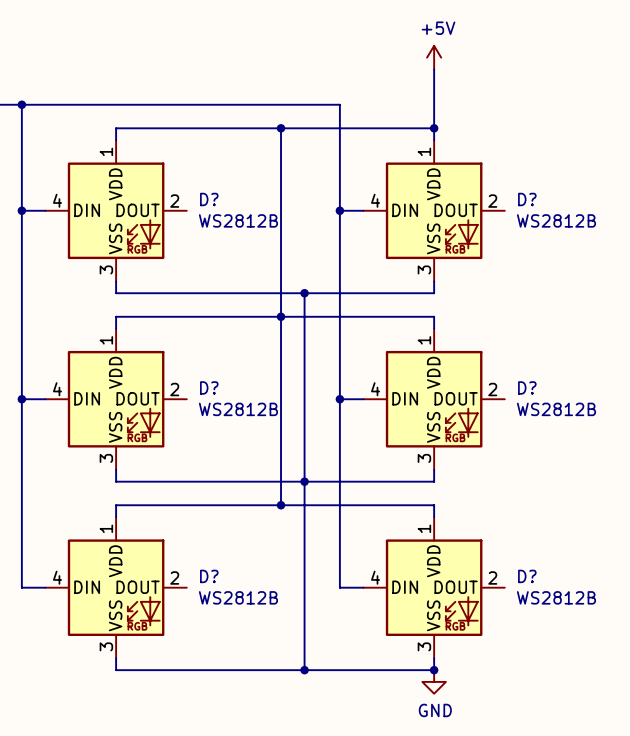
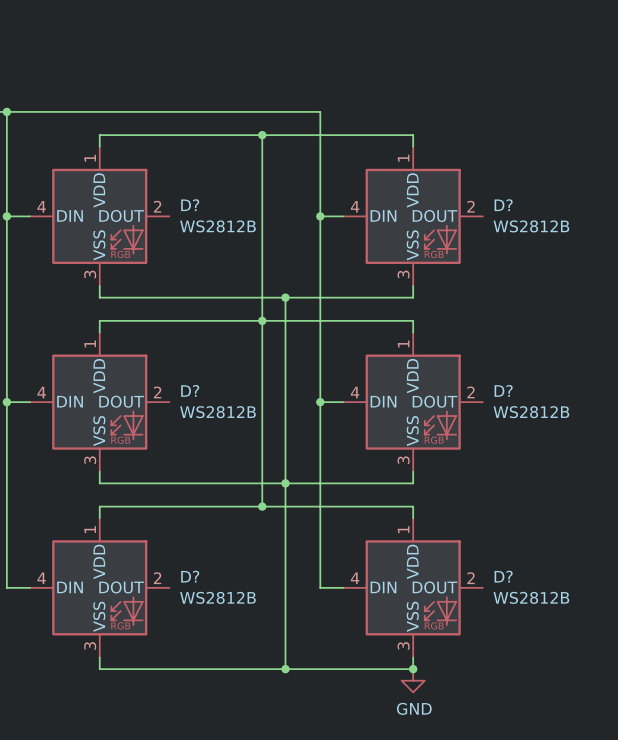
power symbol: +5V (434, 57) -> none
wire: (434, 69) (434, 128) -> none
junction: (434, 128) -> none

